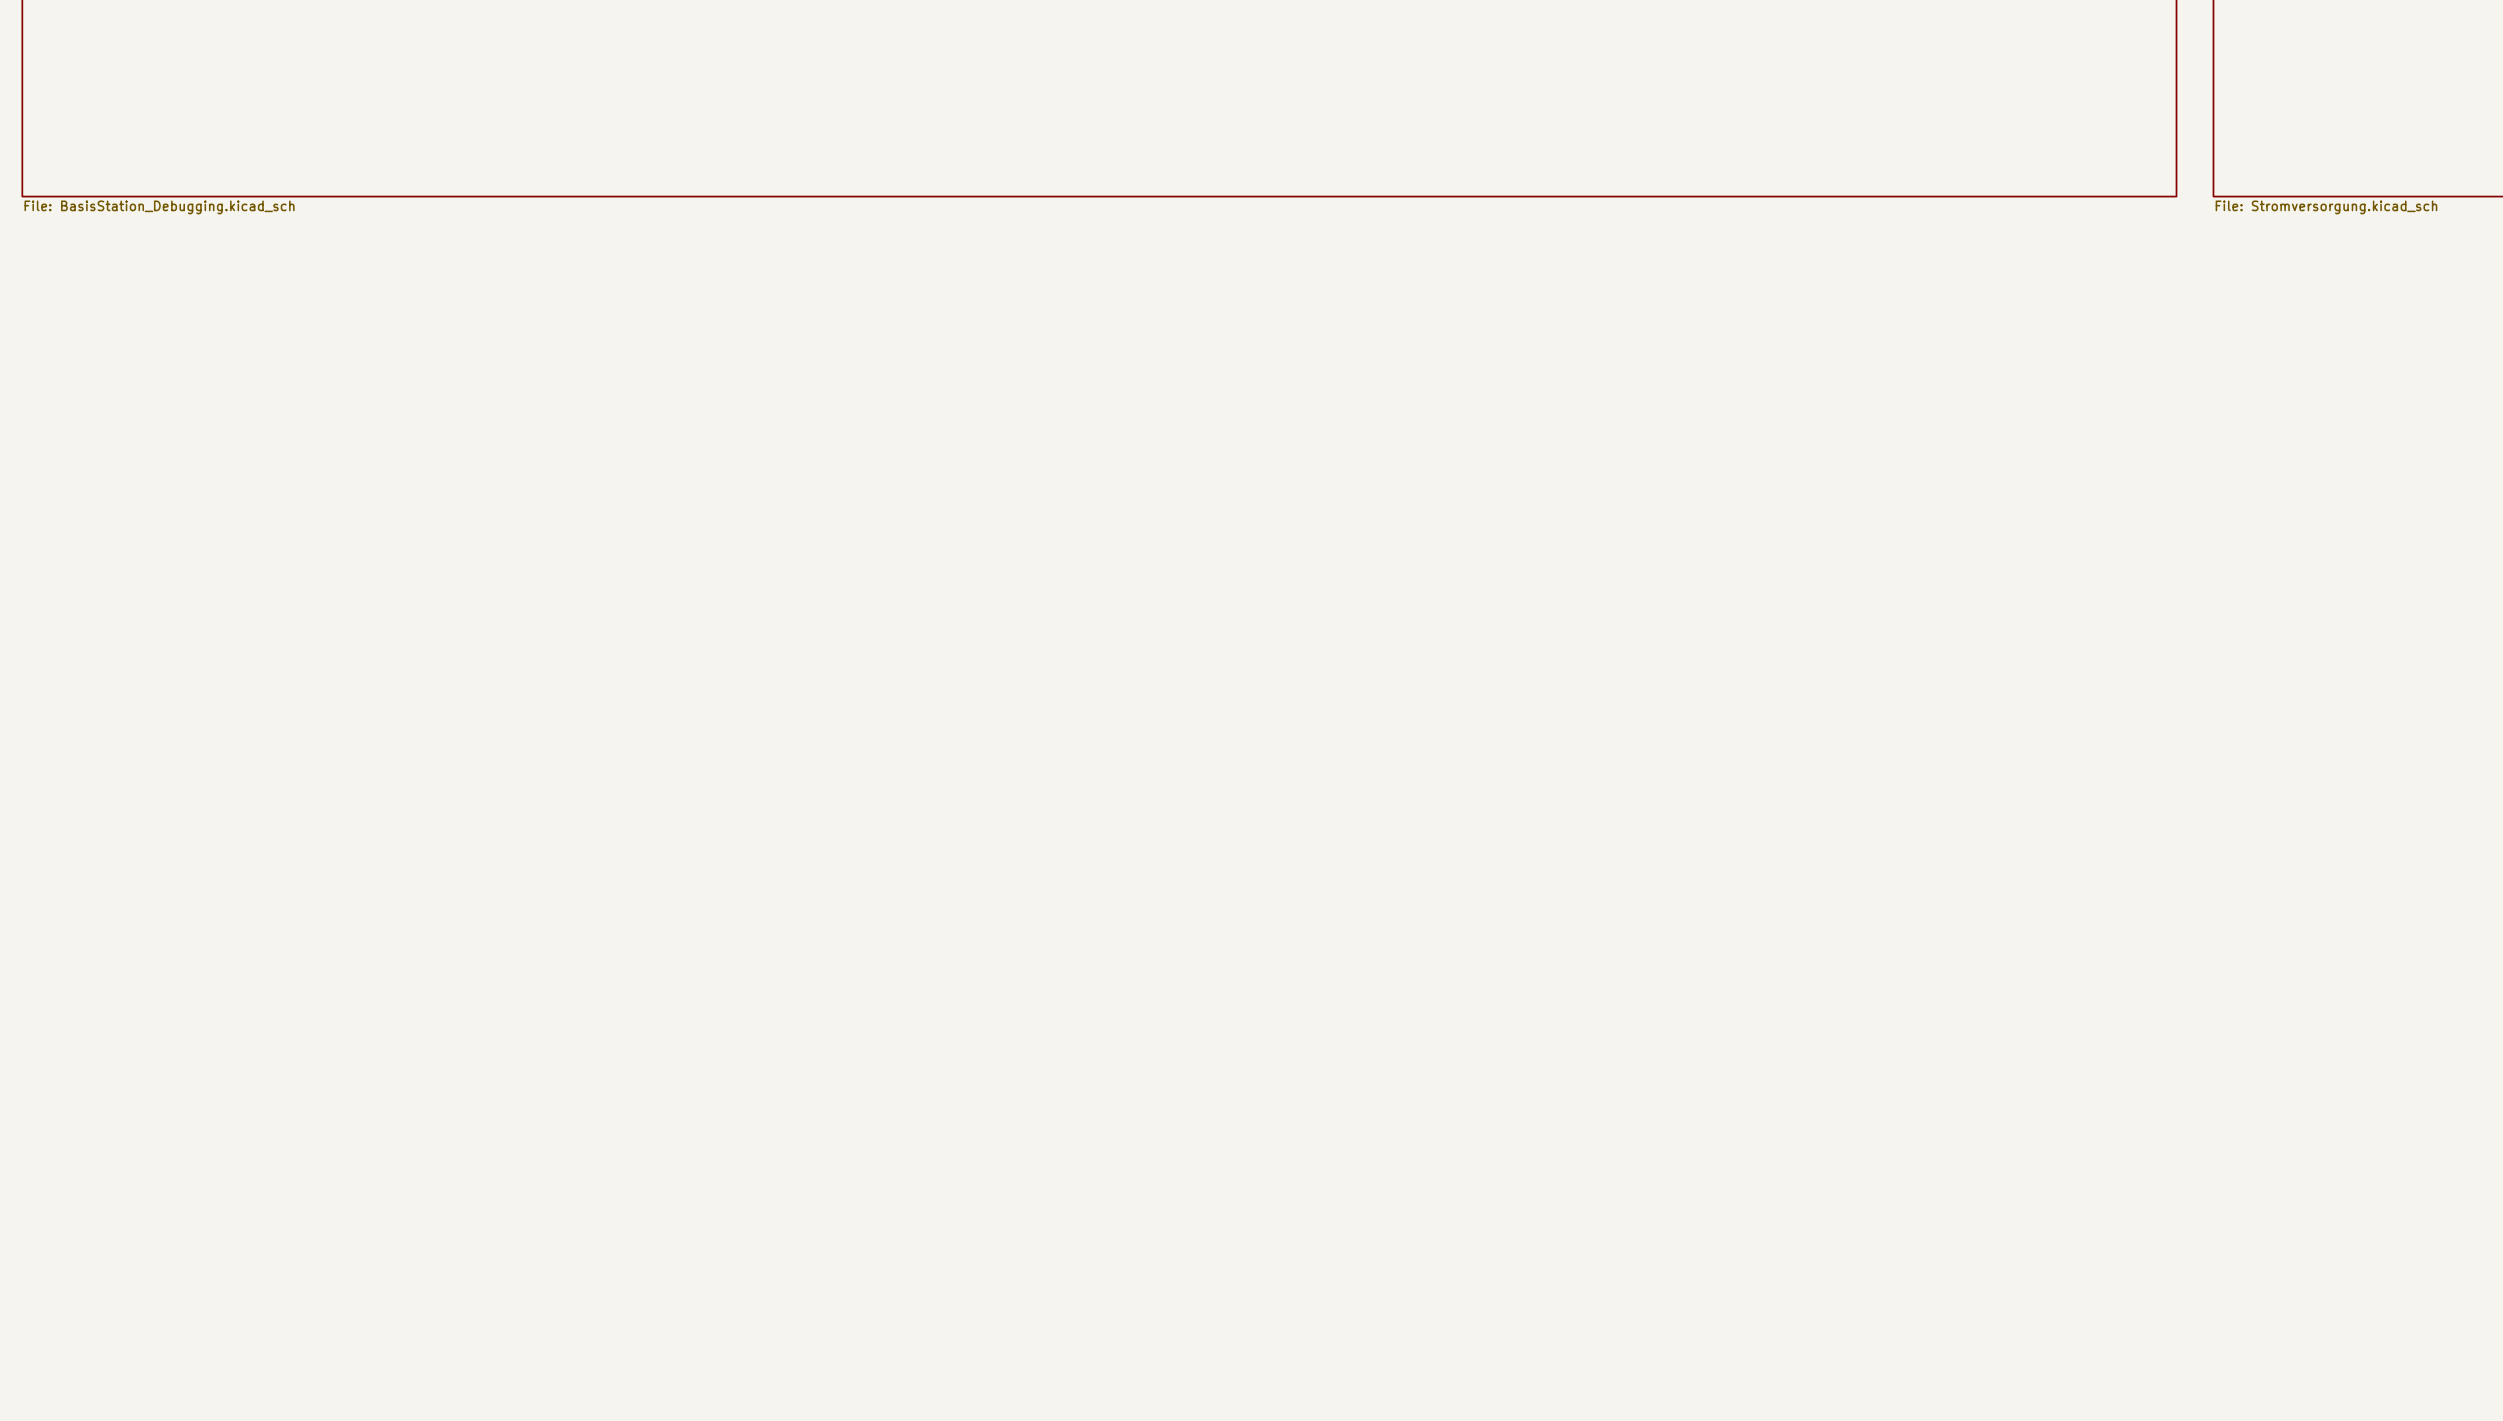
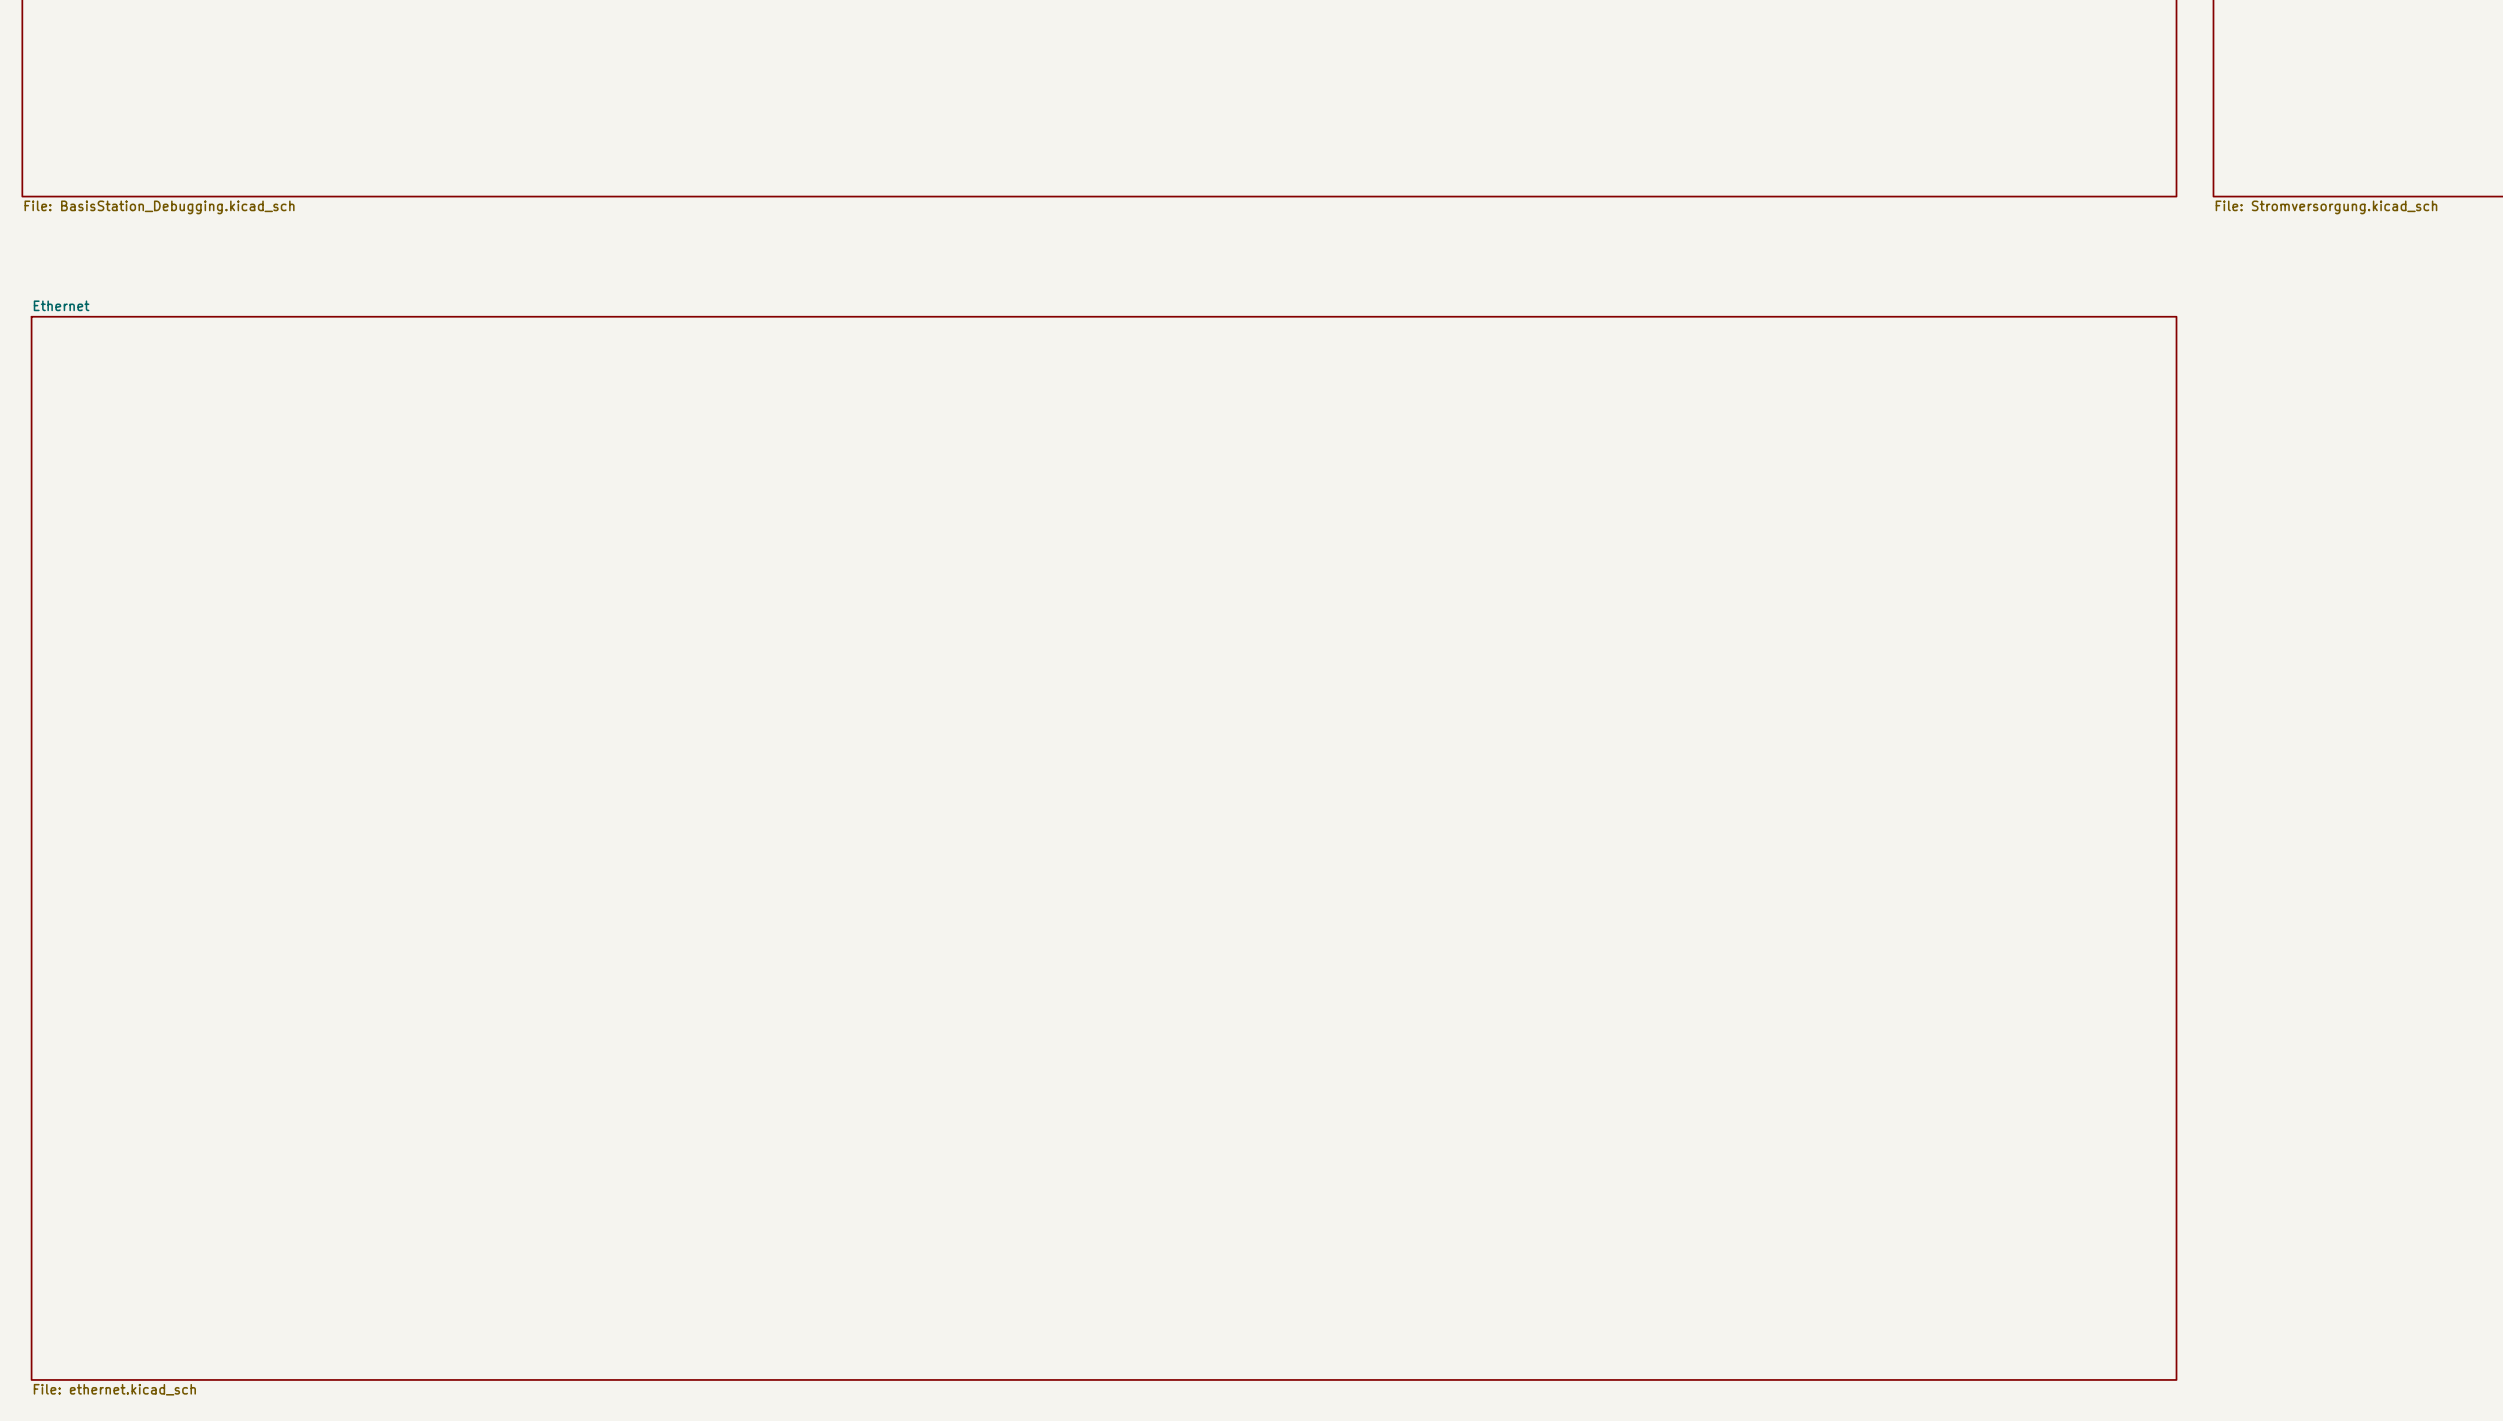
sheet Ethernet: none -> File: ethernet.kicad_sch (1104, 848)

